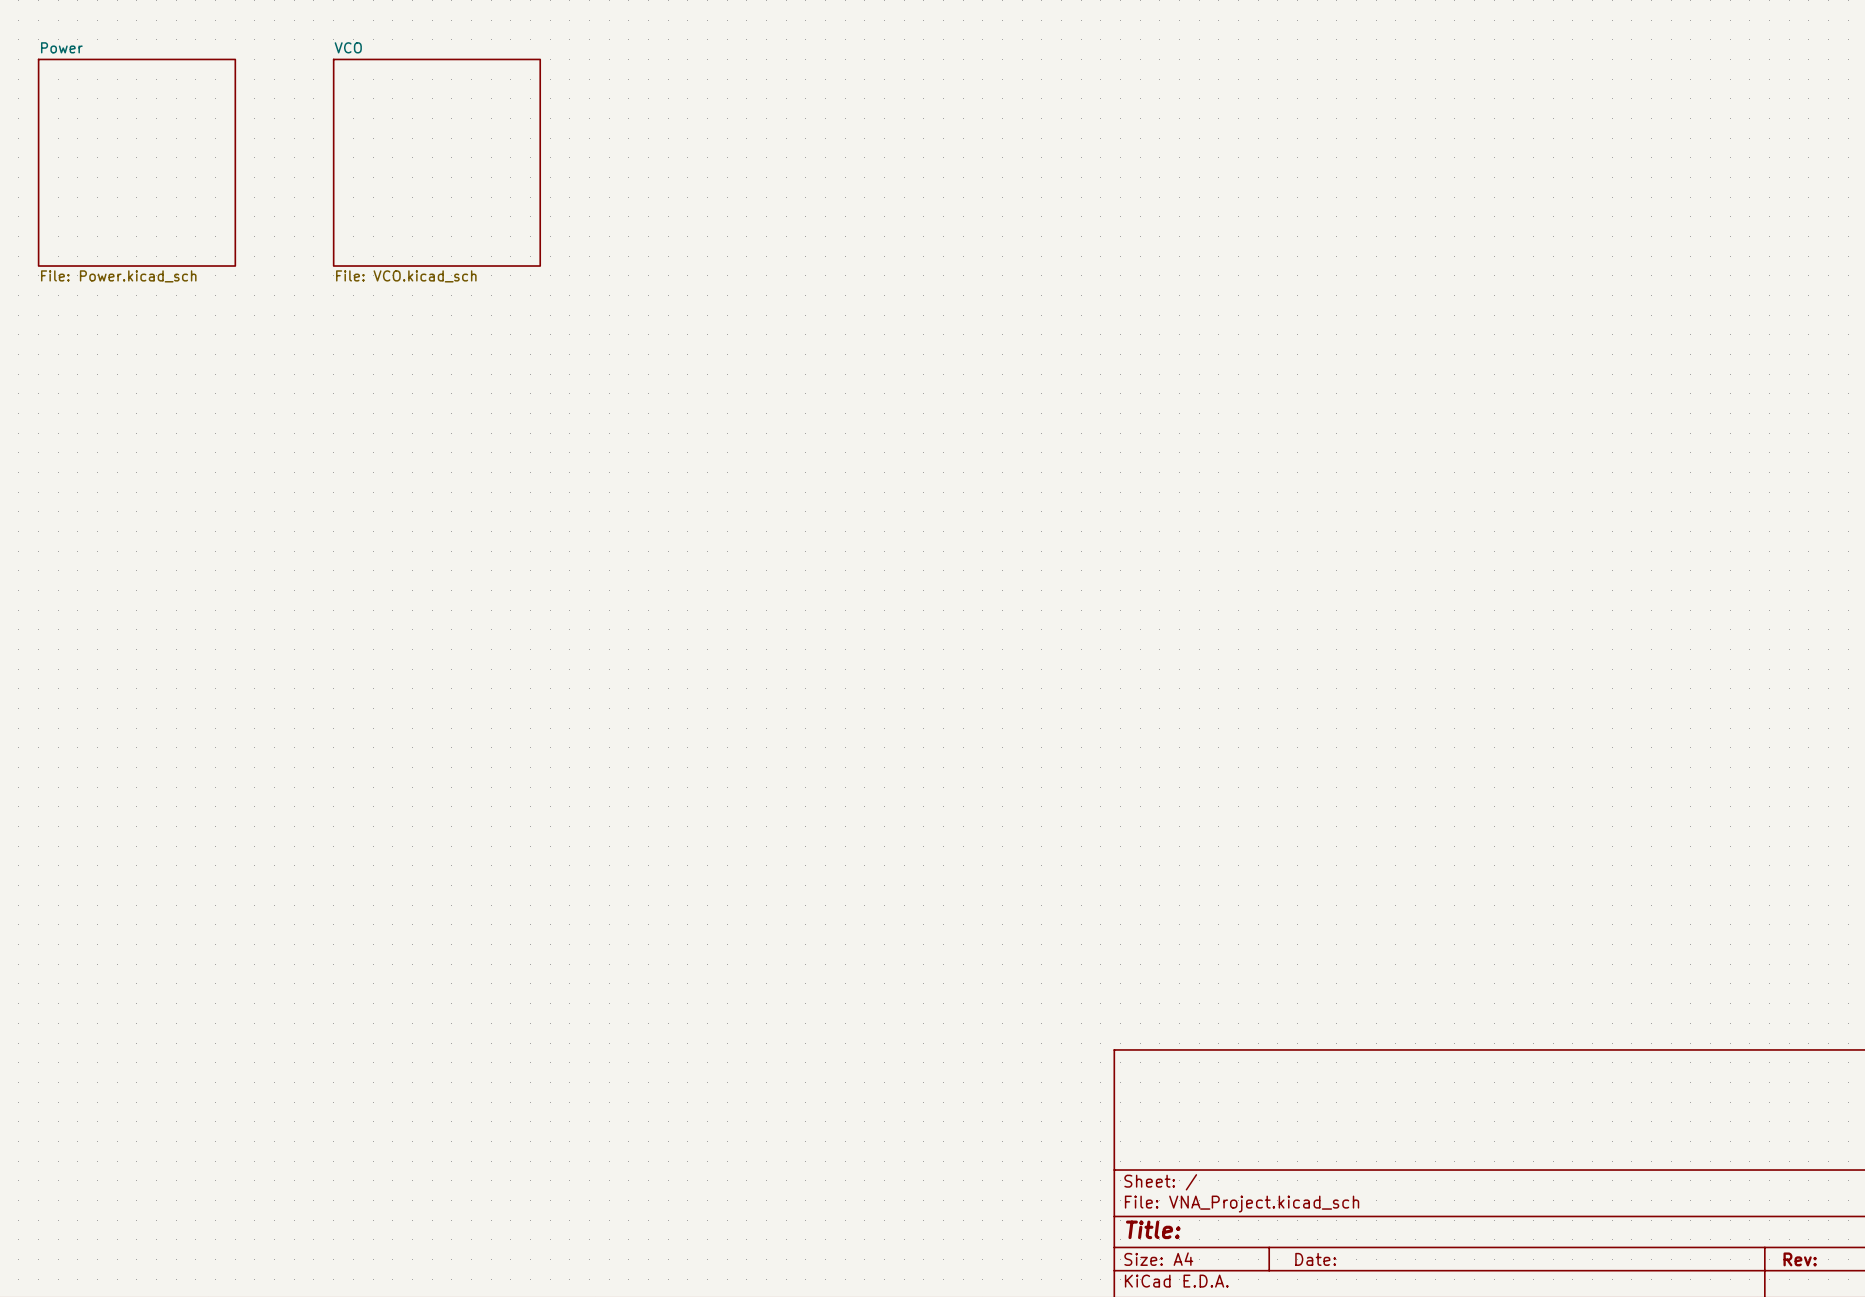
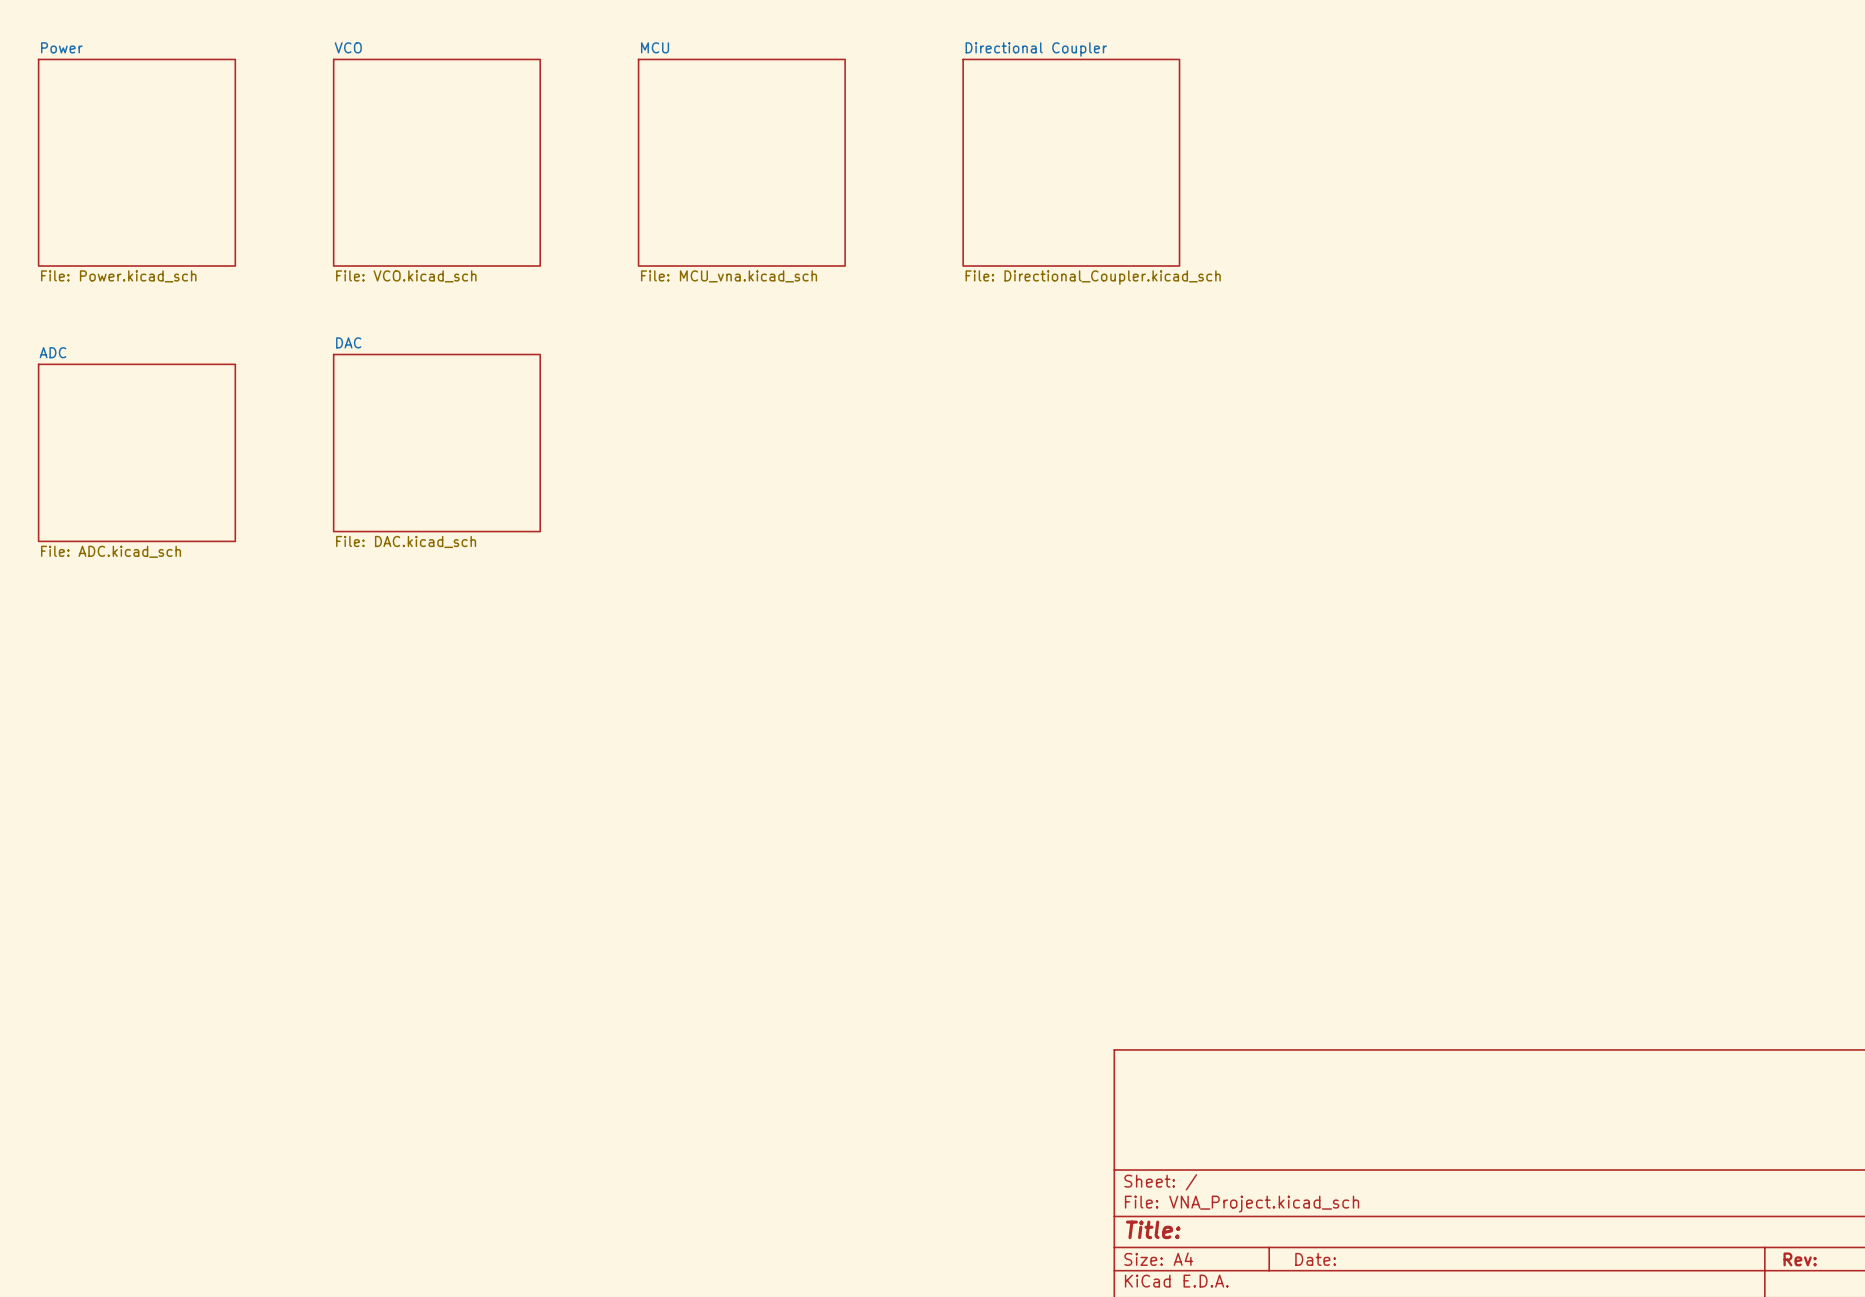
sheet MCU: none -> File: MCU_vna.kicad_sch (741, 162)
sheet Directional Coupler: none -> File: Directional_Coupler.kicad_sch (1071, 162)
sheet DAC: none -> File: DAC.kicad_sch (436, 443)
sheet ADC: none -> File: ADC.kicad_sch (136, 452)

